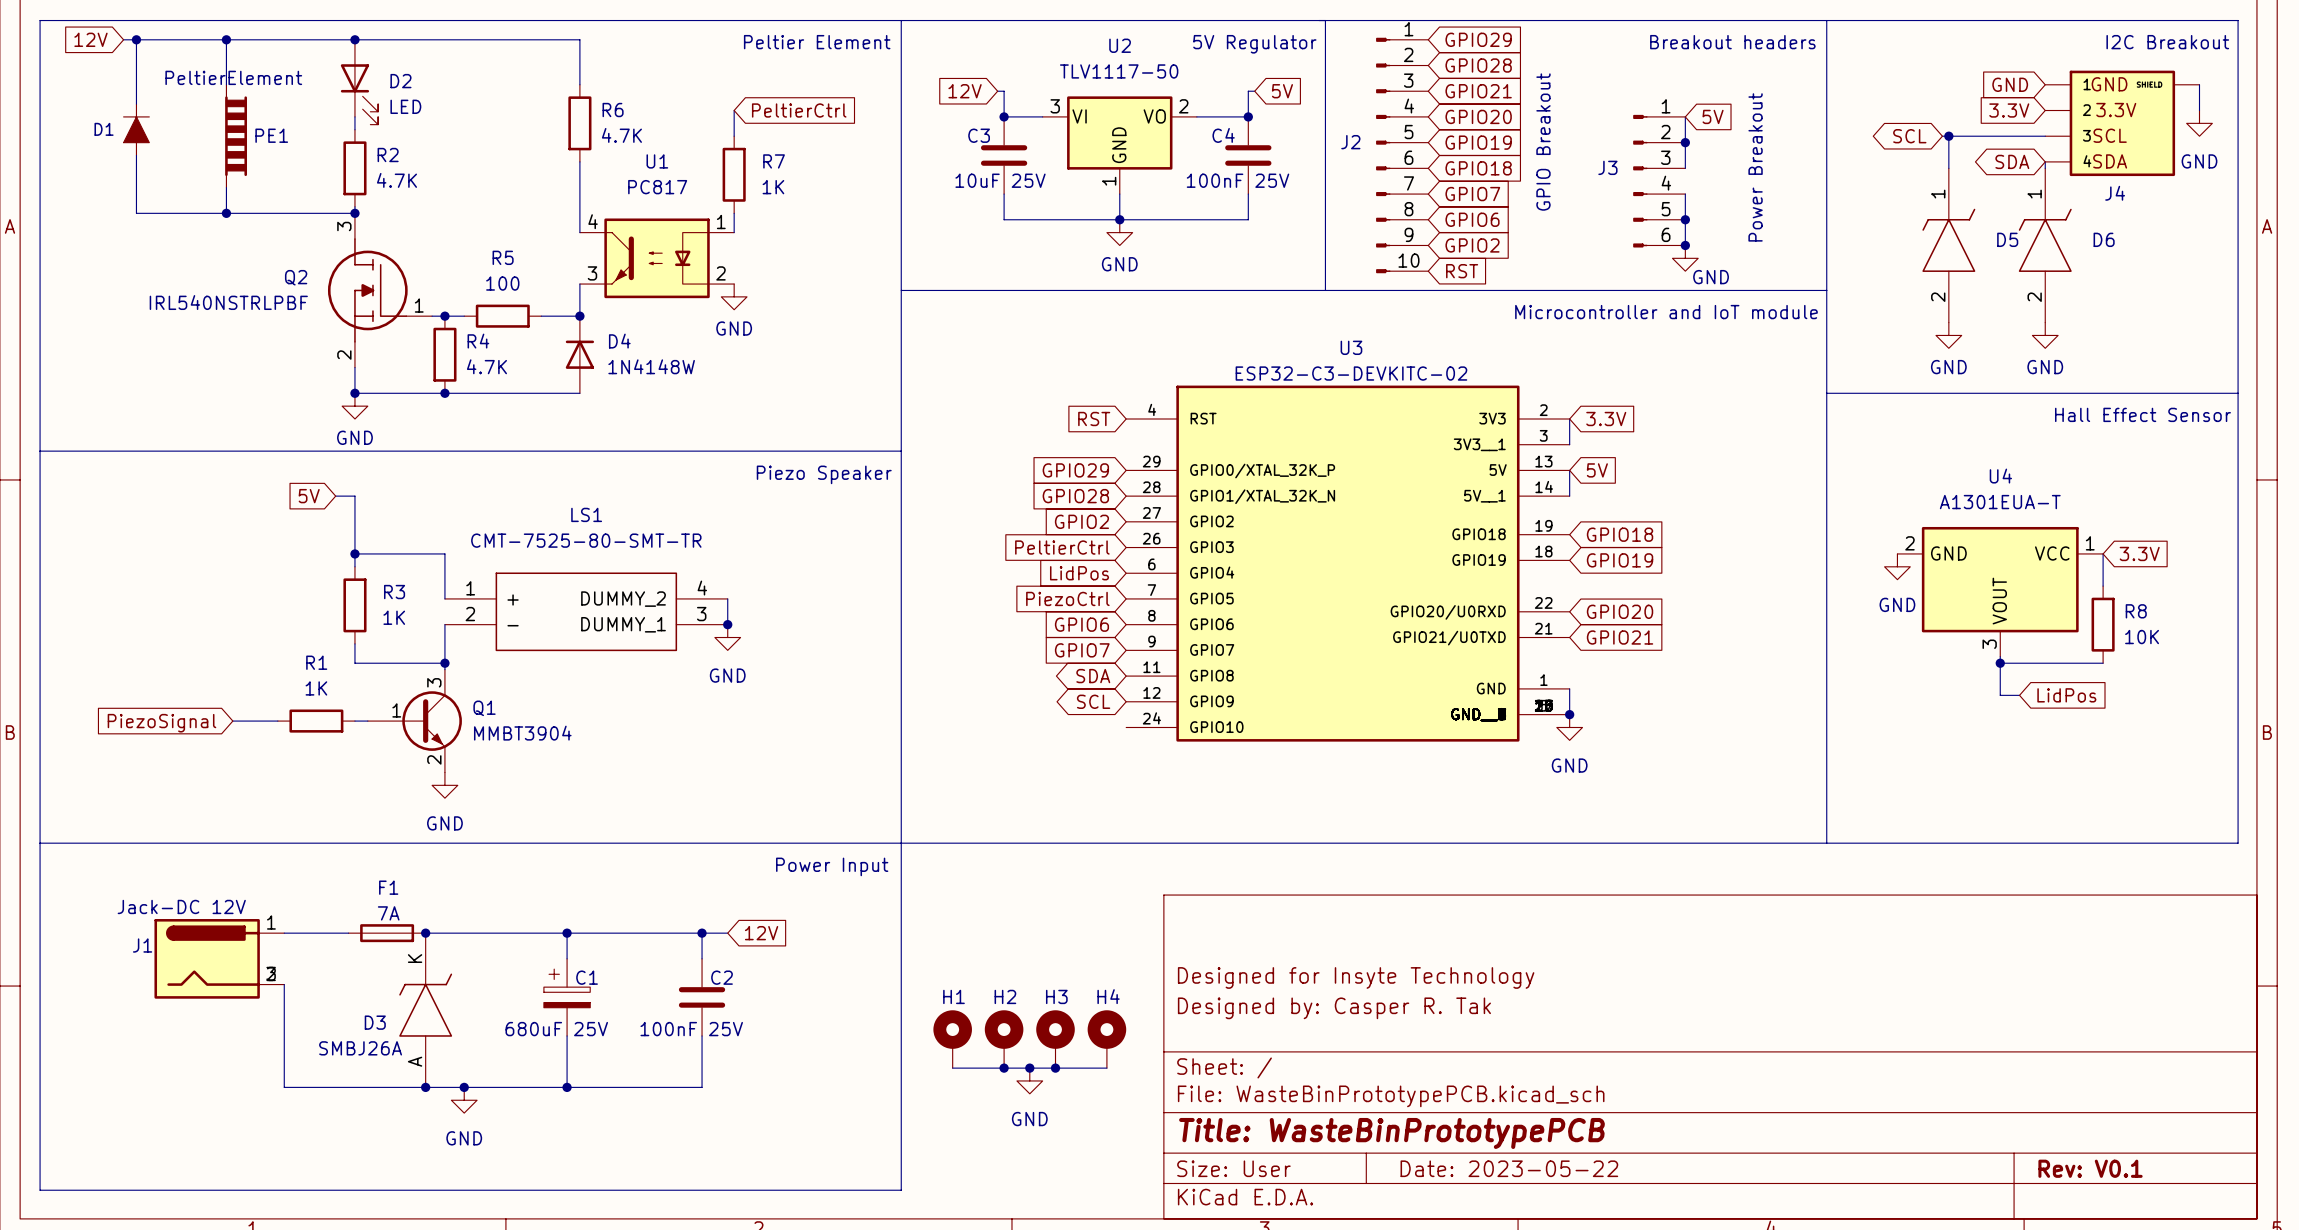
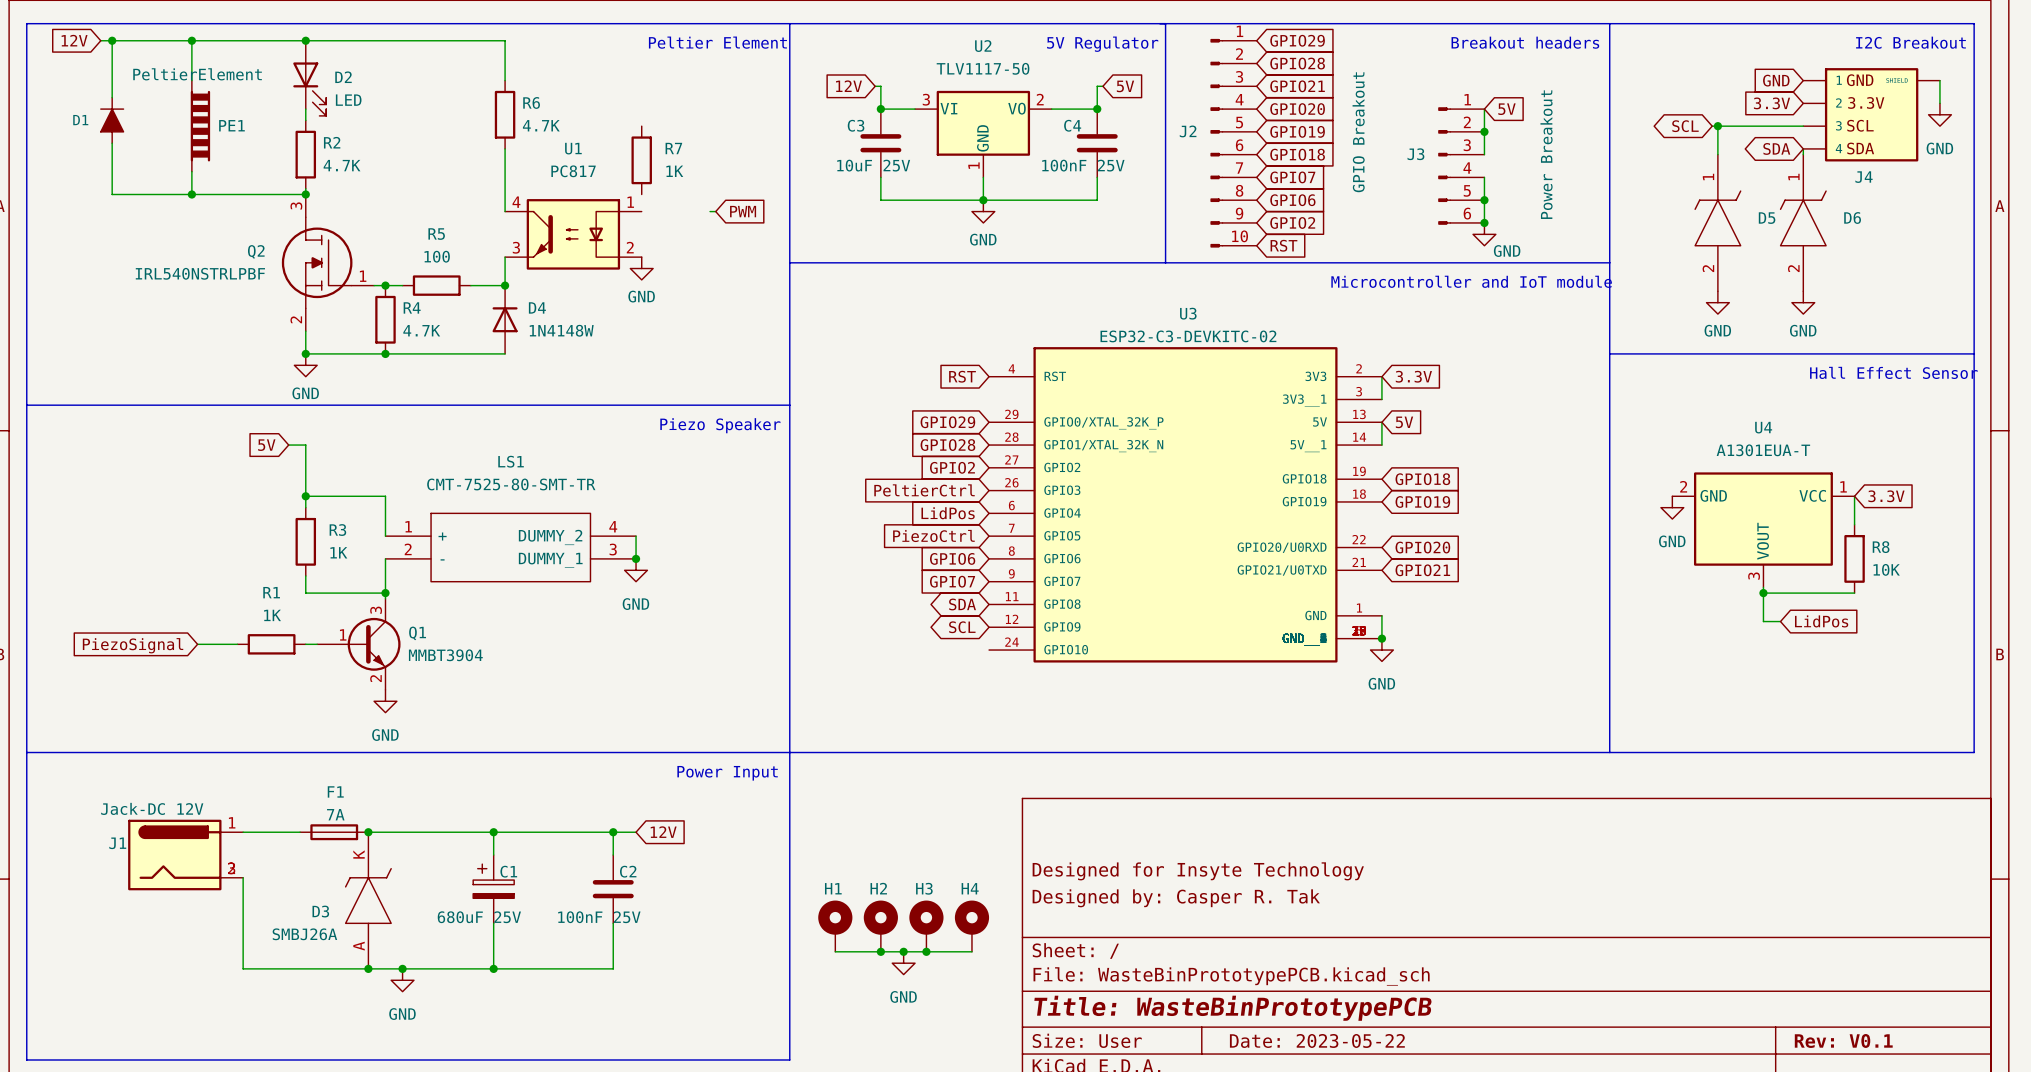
wire: (734, 110) (734, 136) -> none
global label: PeltierCtrl (799, 110) -> none
wire: (734, 213) (734, 232) -> none
wire: none -> (710, 211) (715, 211)
global label: none -> PWM (743, 211)

